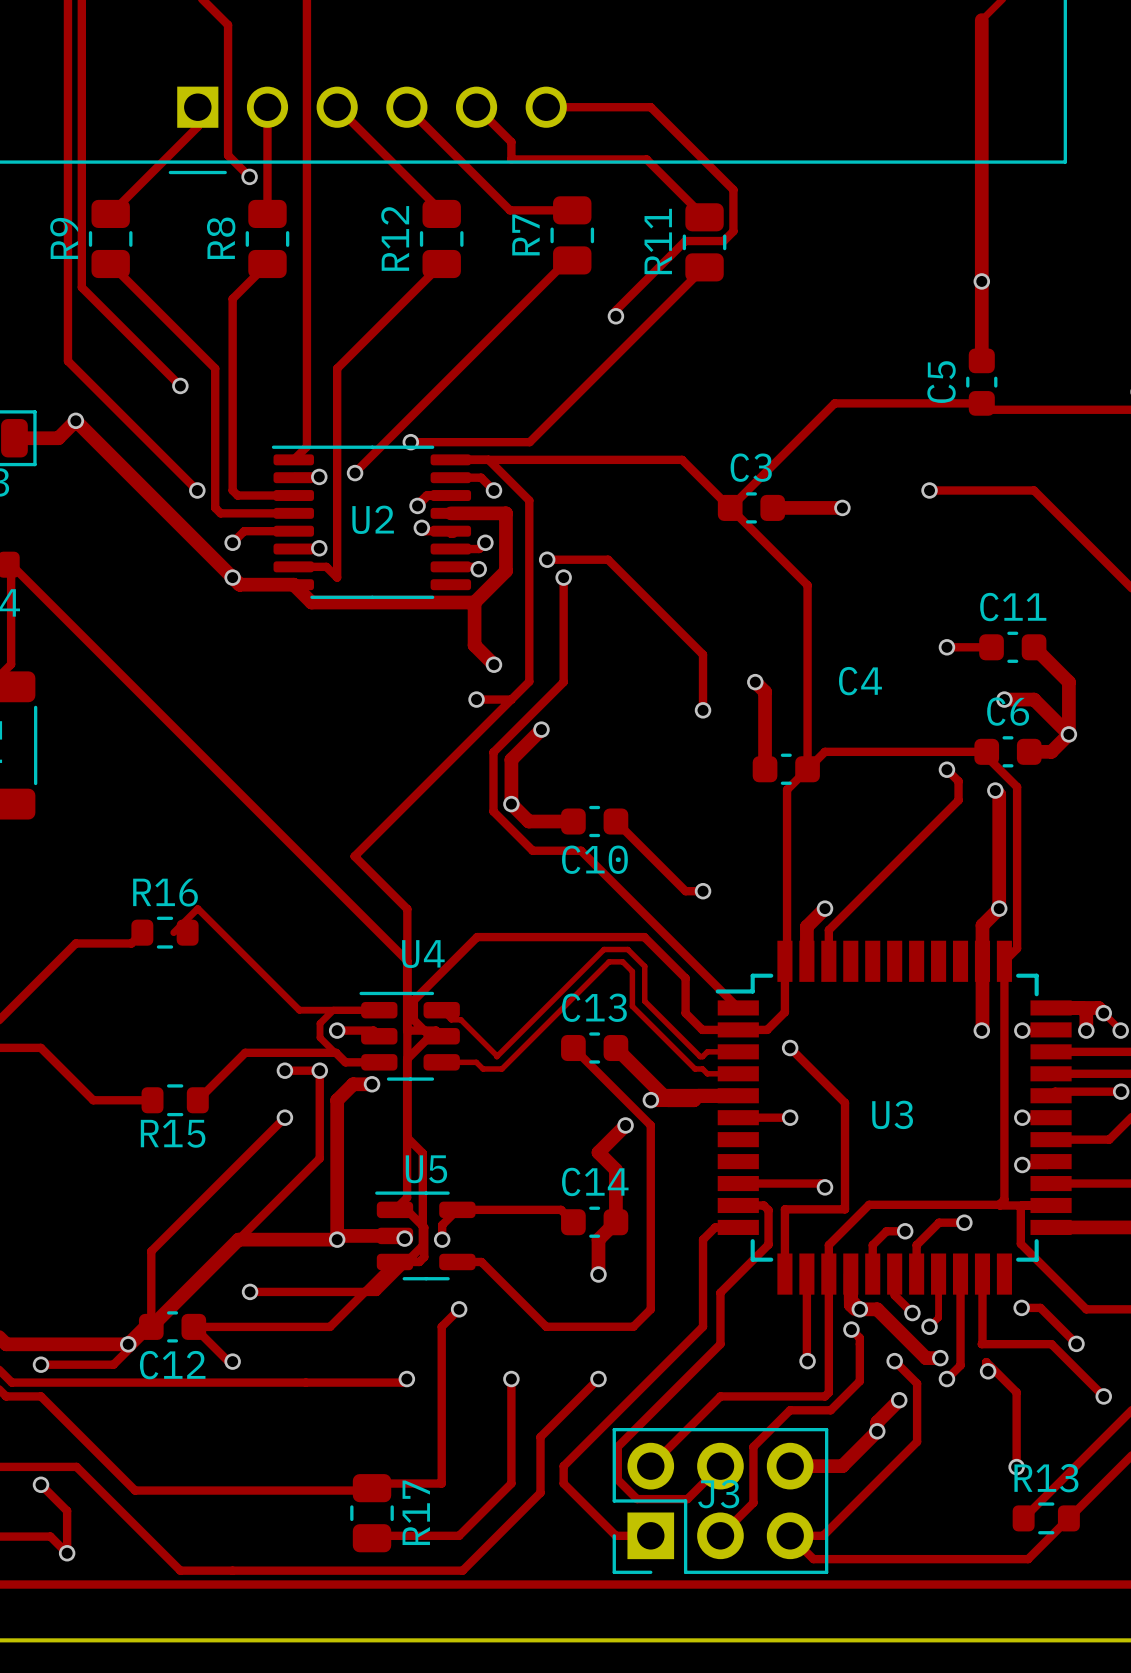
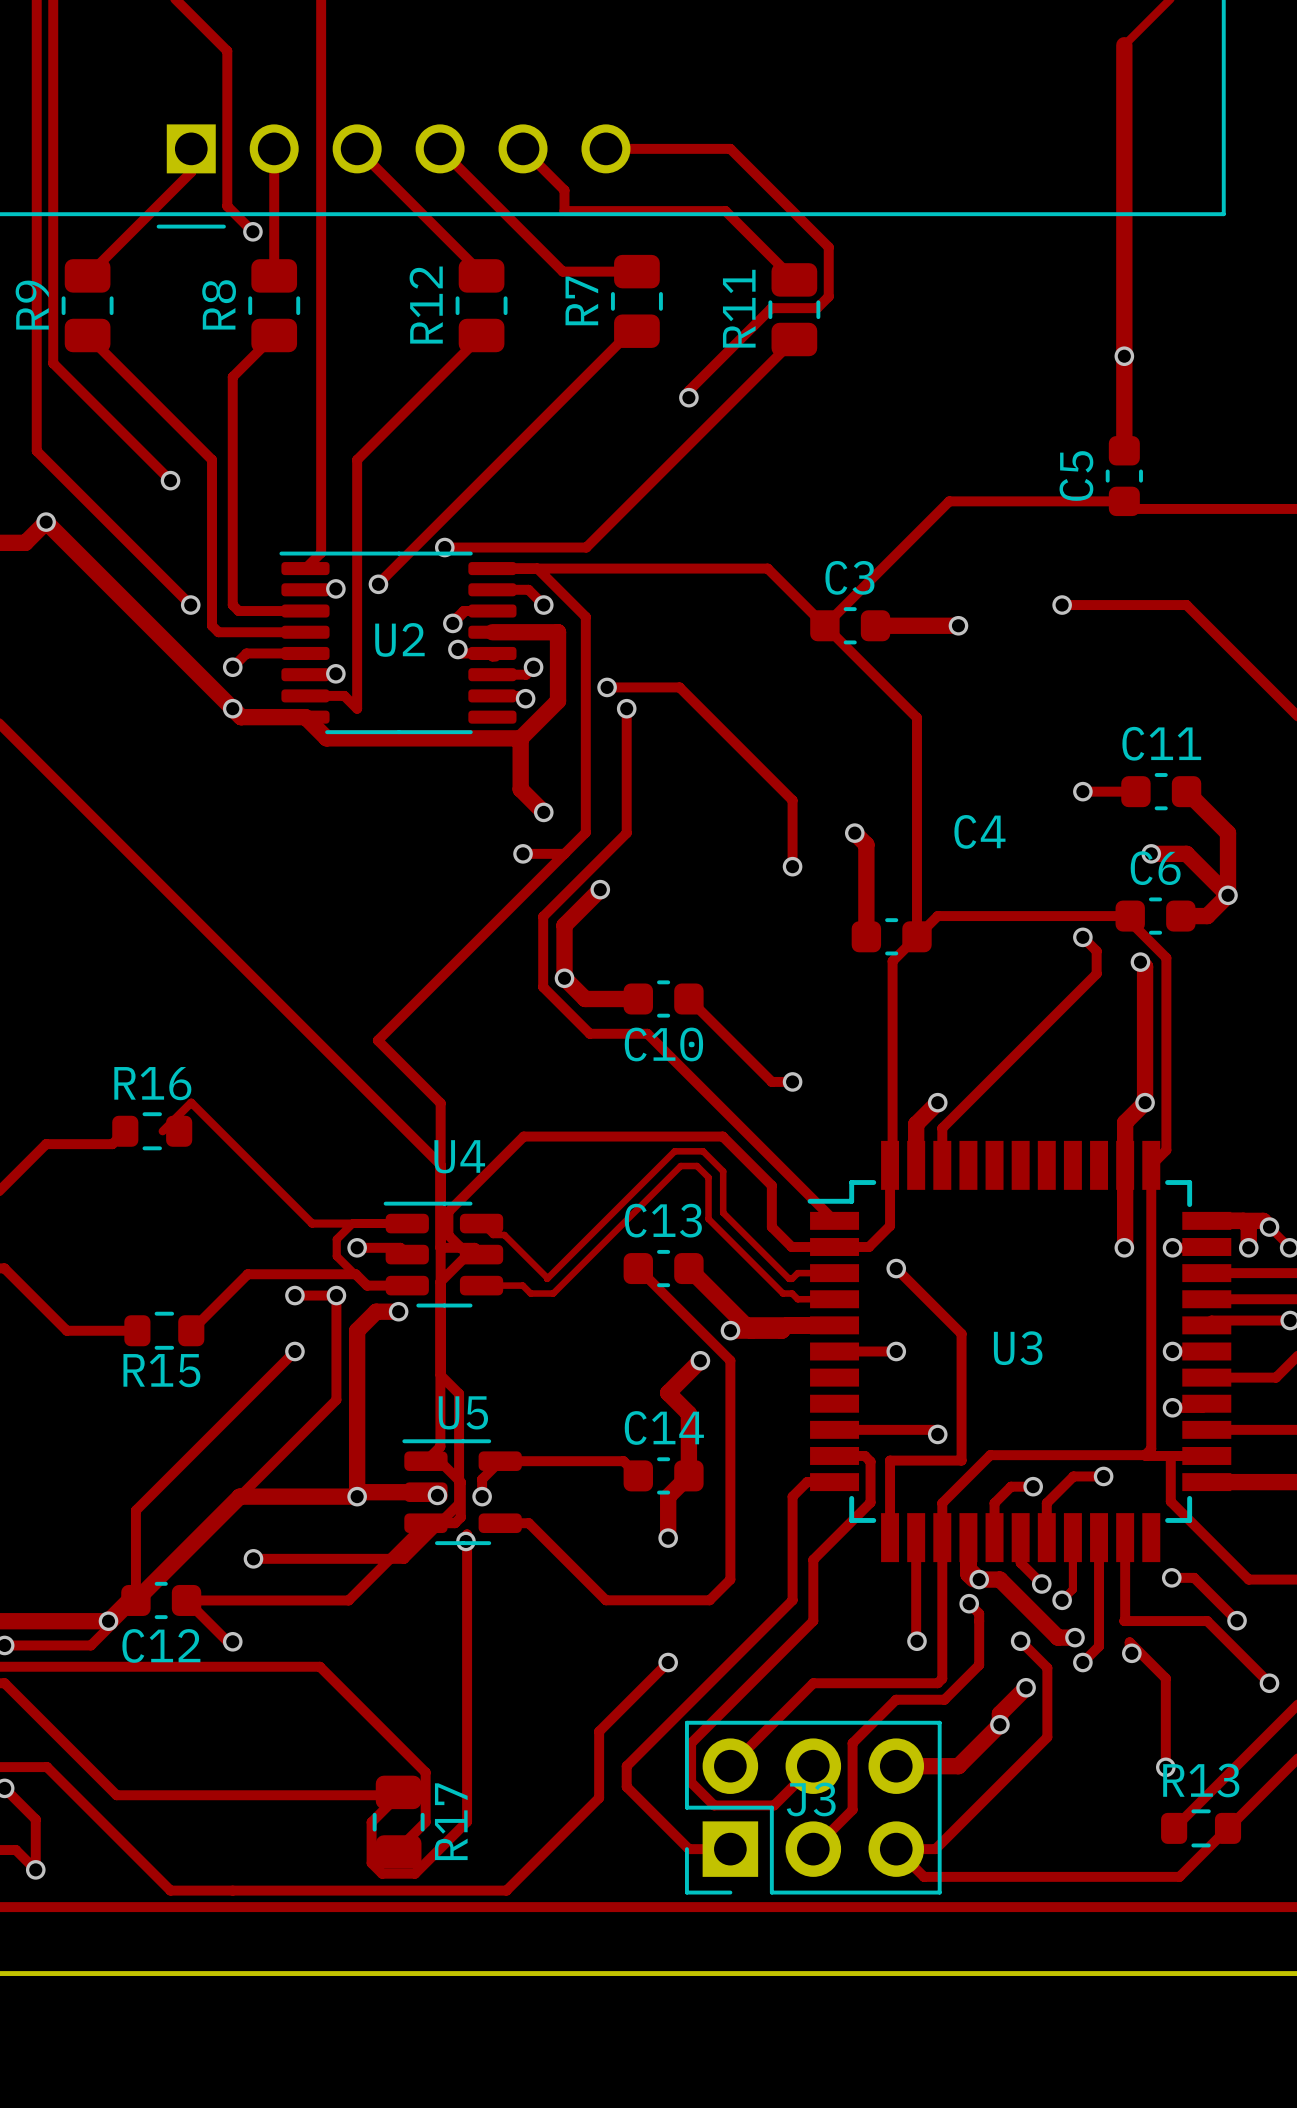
track: none -> (467, 1534) (467, 1821) (415, 1873) (382, 1873) (371, 1863) (371, 1822) (398, 1795)
track: (459, 1309) (441, 1326) (441, 1483) (376, 1483) (372, 1488) -> none
via position: (459, 1309) -> (465, 1541)
track: (406, 1379) (403, 1382) (305, 1382) -> (398, 1849) (425, 1822) (425, 1772) (319, 1666)
via: (406, 1379) -> none
track: (511, 1379) (511, 1483) (459, 1535) (374, 1535) -> none
via: (511, 1379) -> none

